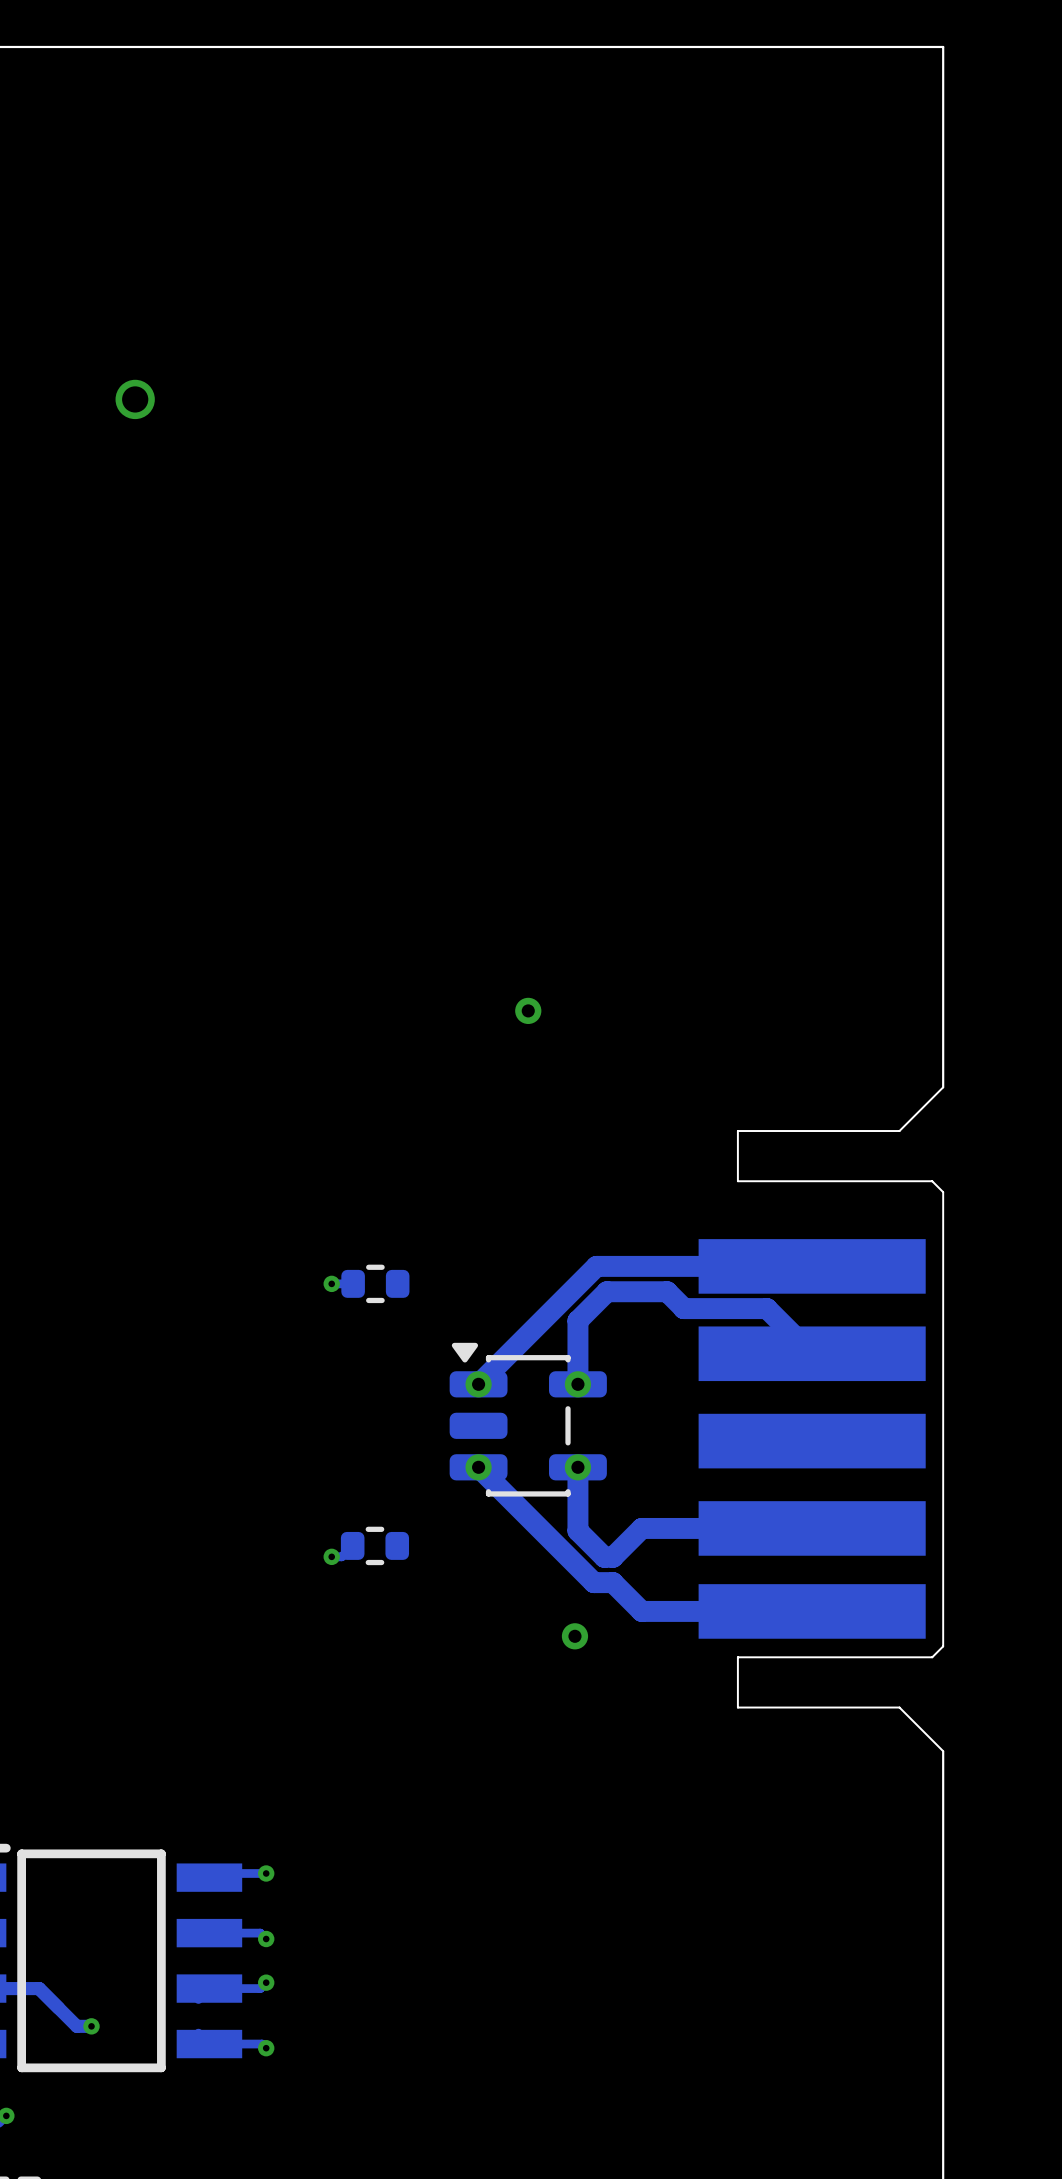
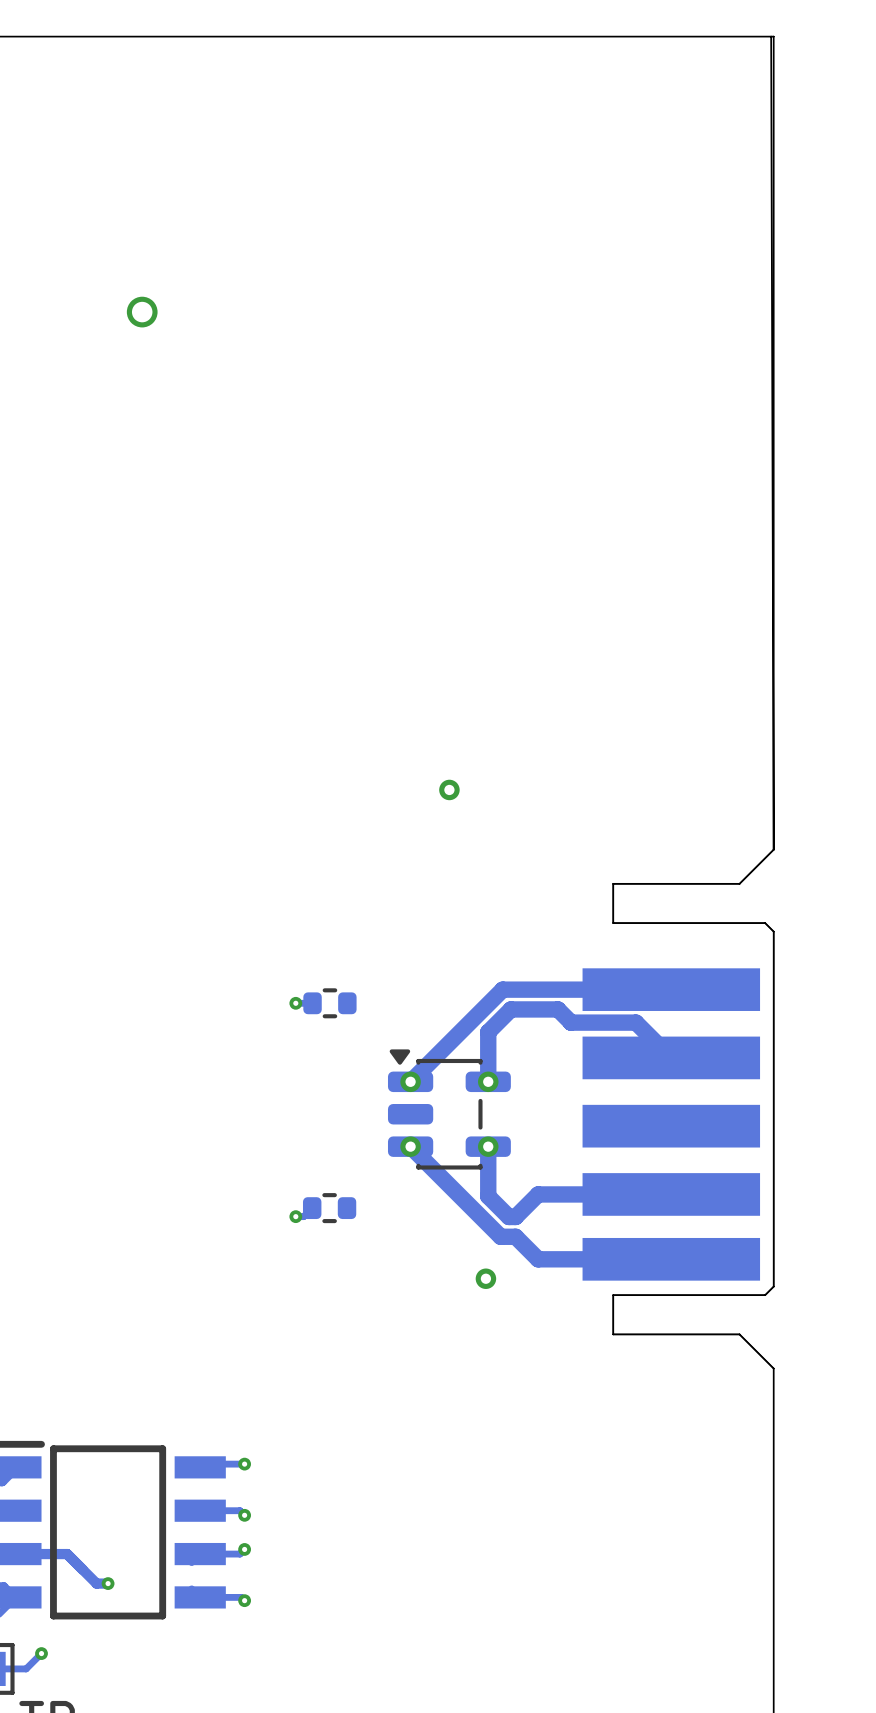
board edge: none -> (771, 36) (773, 849) (739, 883) (613, 883) (613, 923) (765, 923) (773, 931) (773, 1286) (765, 1295) (613, 1295) (613, 1334) (739, 1334) (773, 1368)

